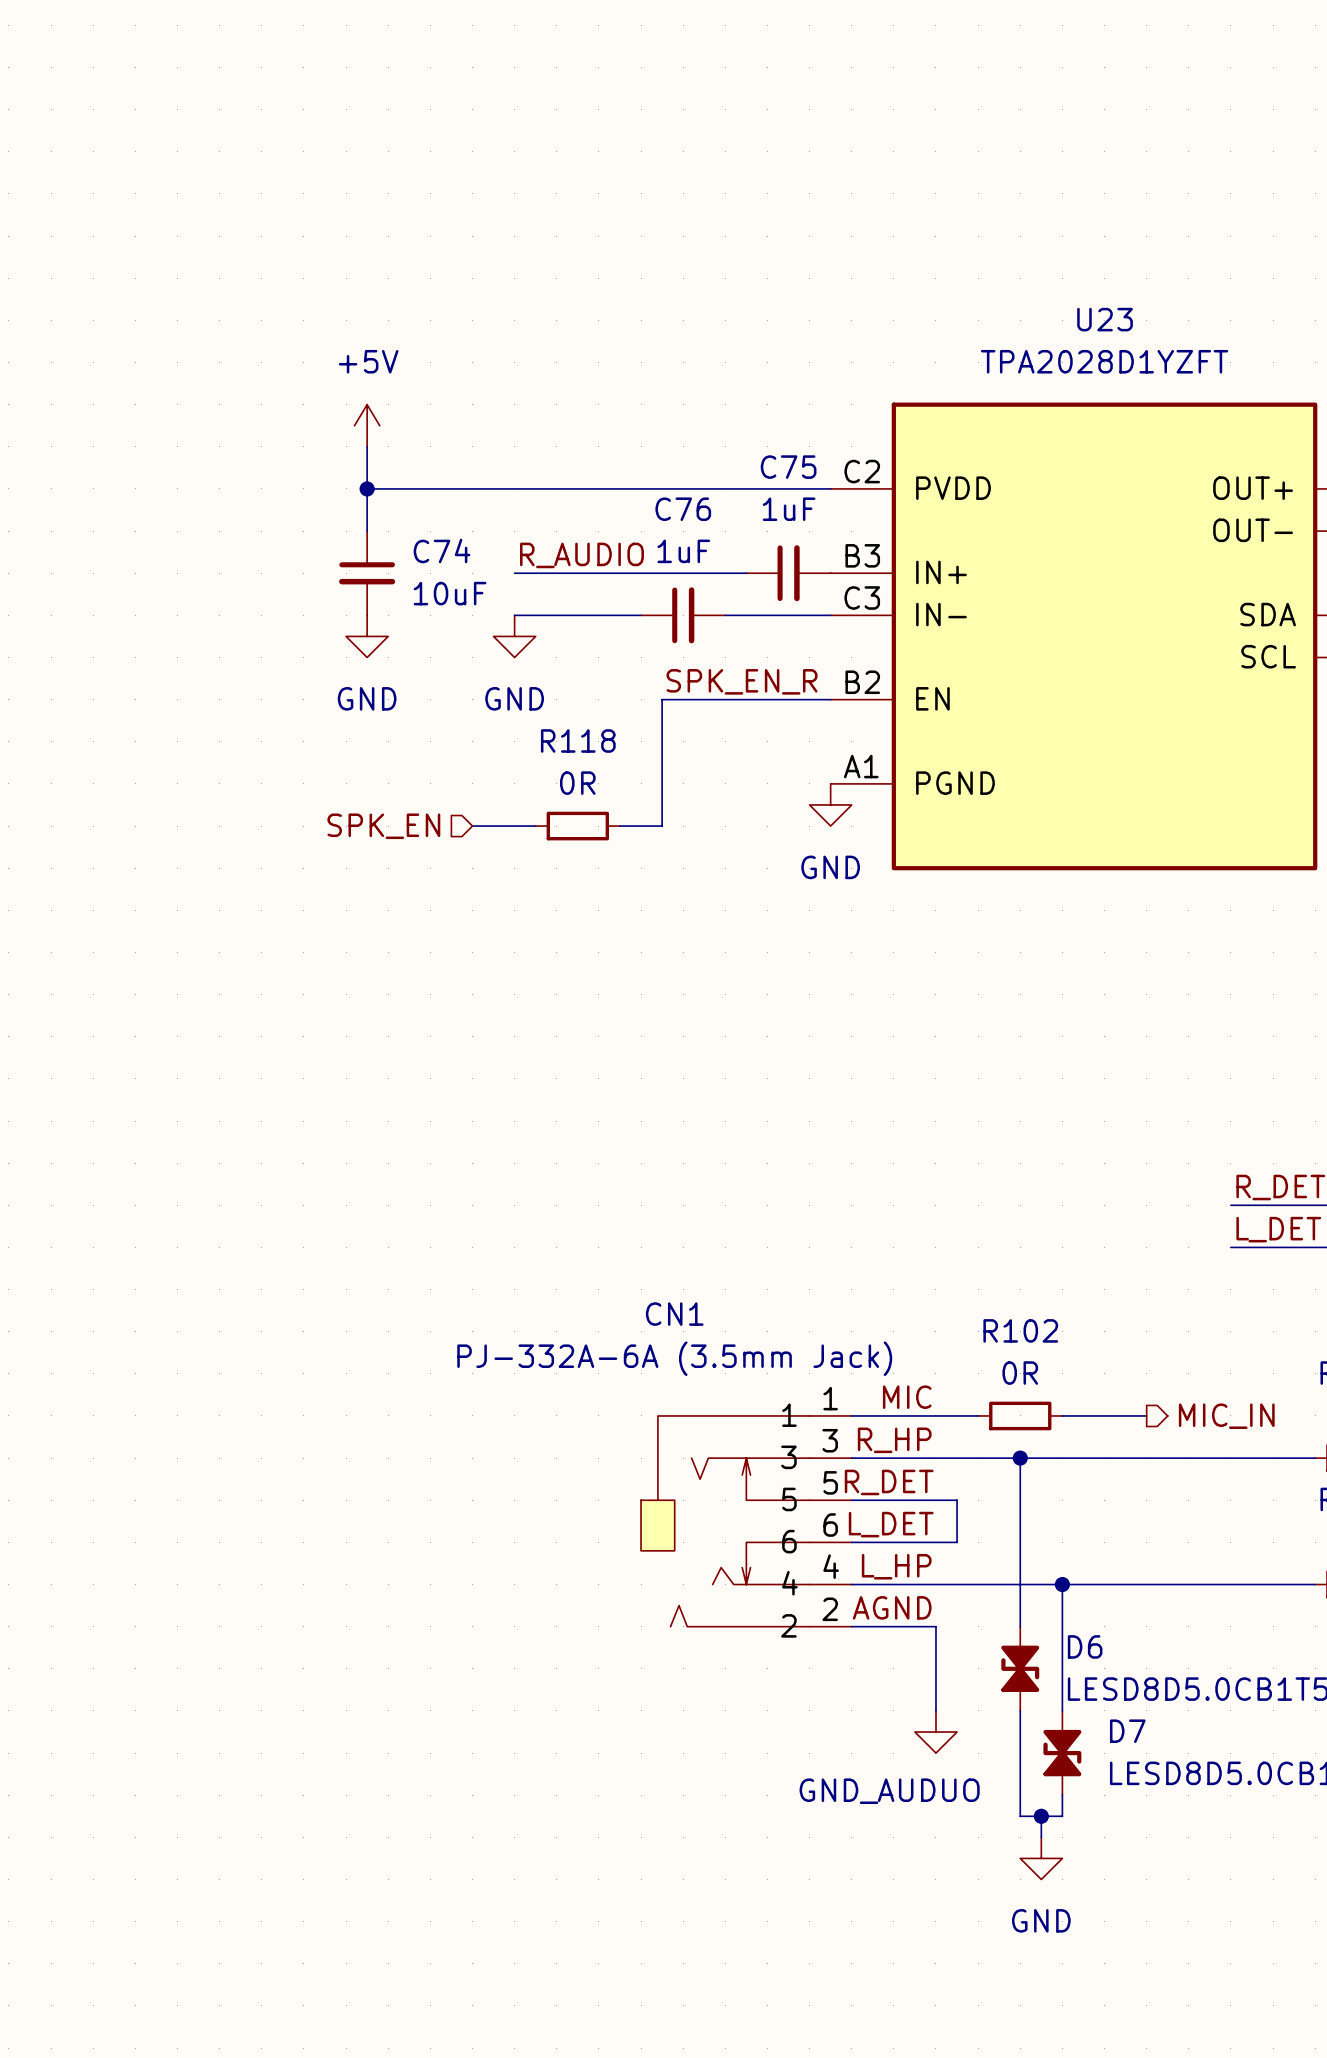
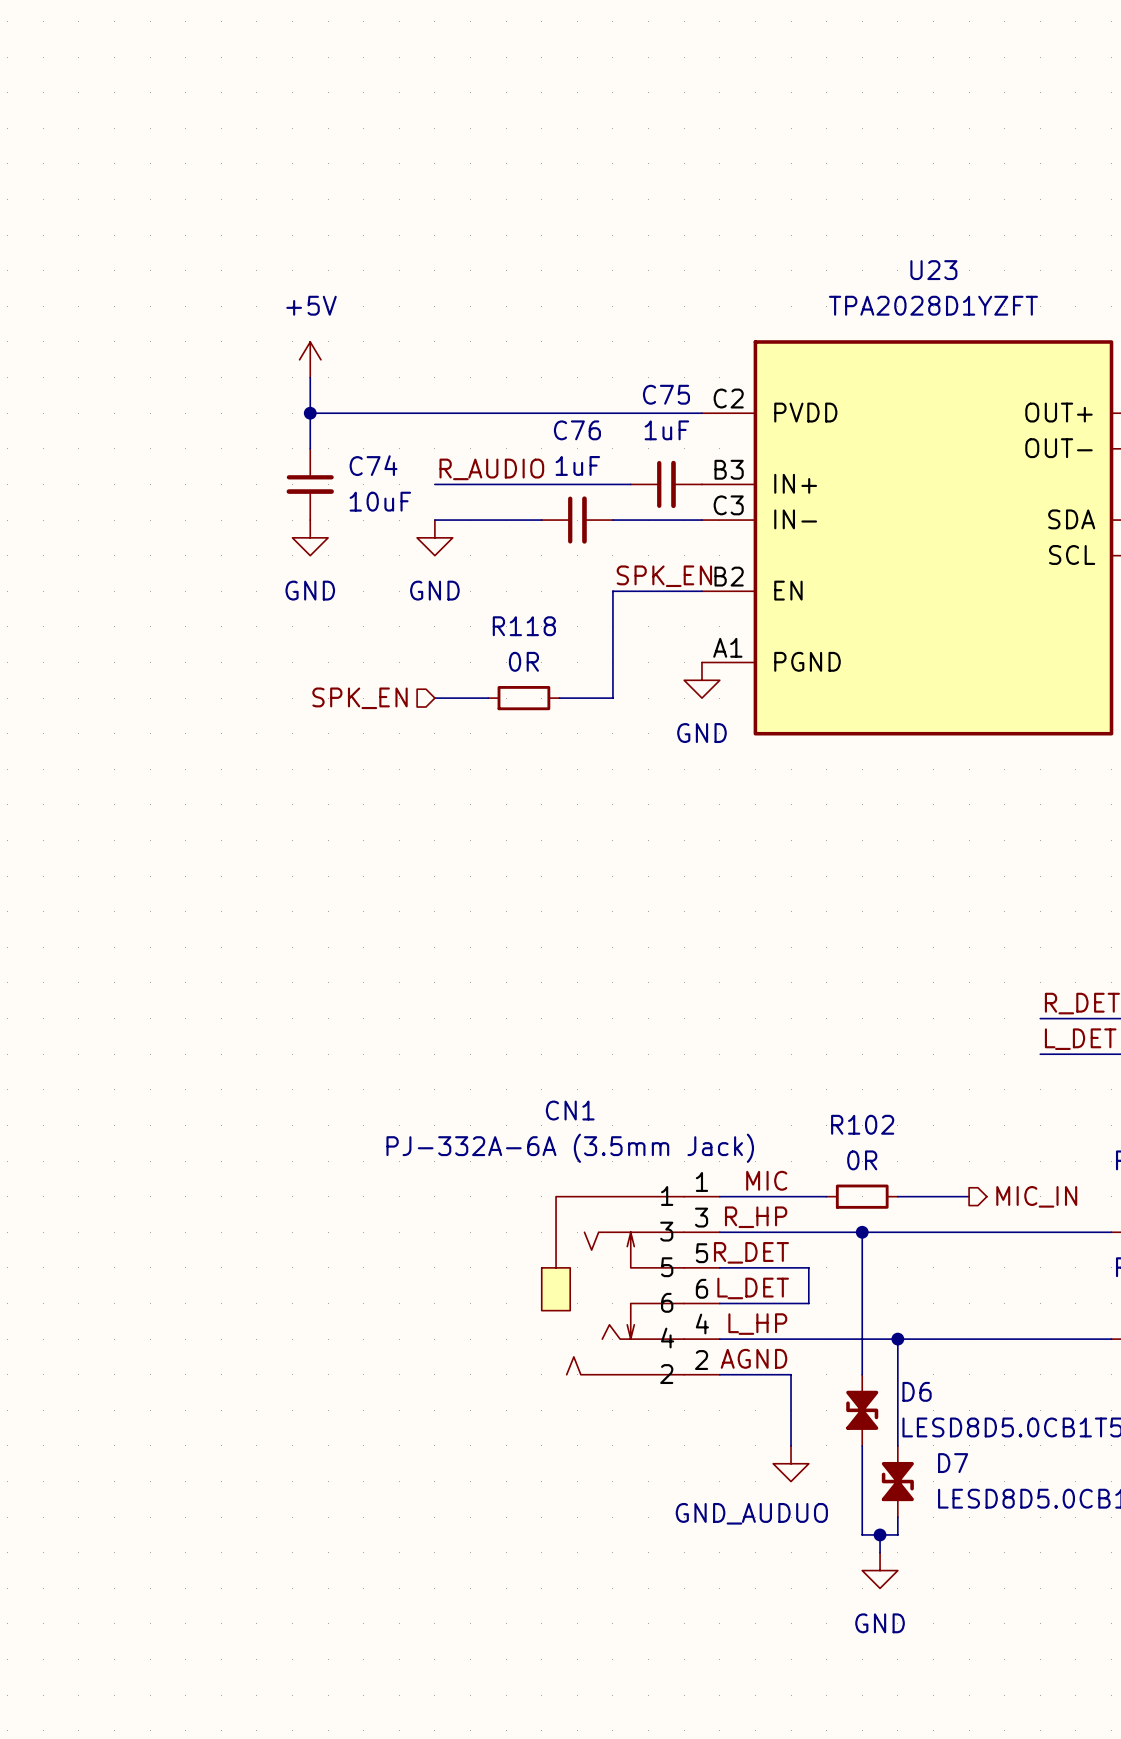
label: SPK_EN_R (742, 681) -> SPK_EN (664, 576)
wire: (725, 699) (662, 699) (662, 826) (619, 826) -> (612, 591) (612, 698) (559, 698)
hierarchical label position: SPK_EN (383, 826) -> SPK_EN (360, 698)
wire: (472, 826) (514, 826) -> (452, 698) (488, 698)
R118 position: (577, 826) -> (523, 698)

